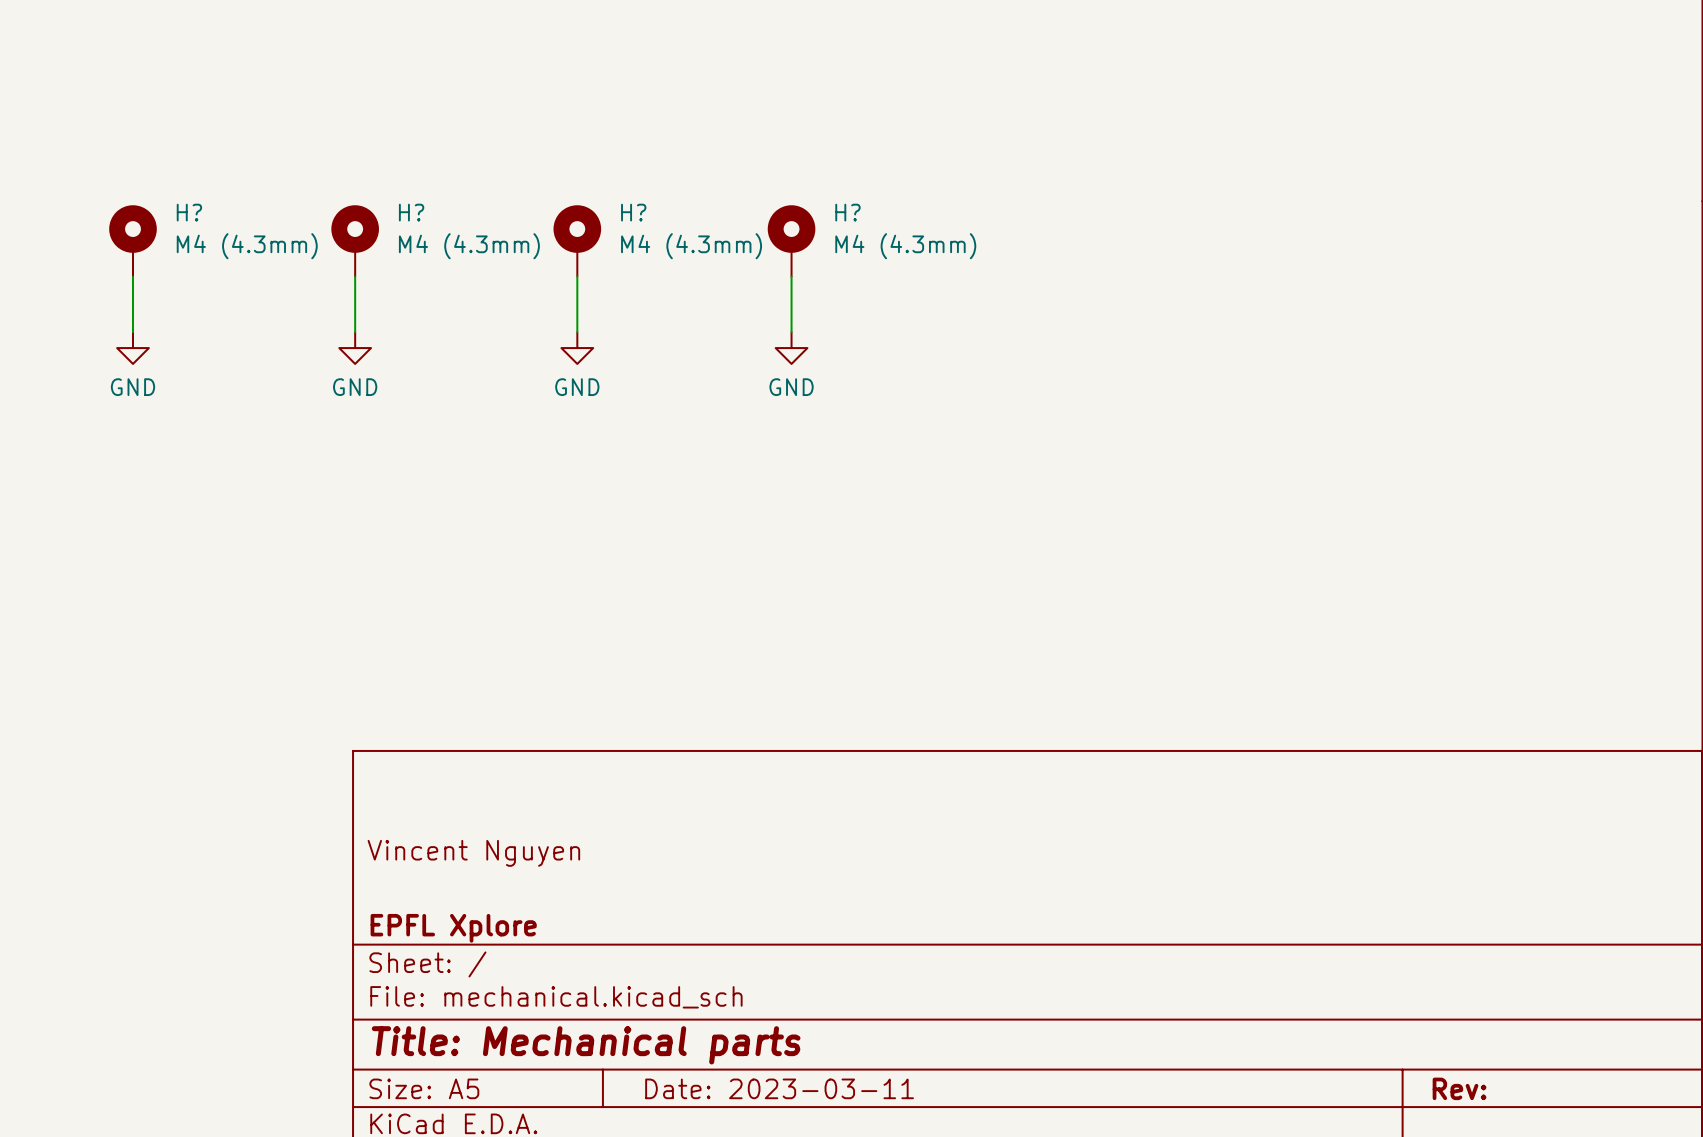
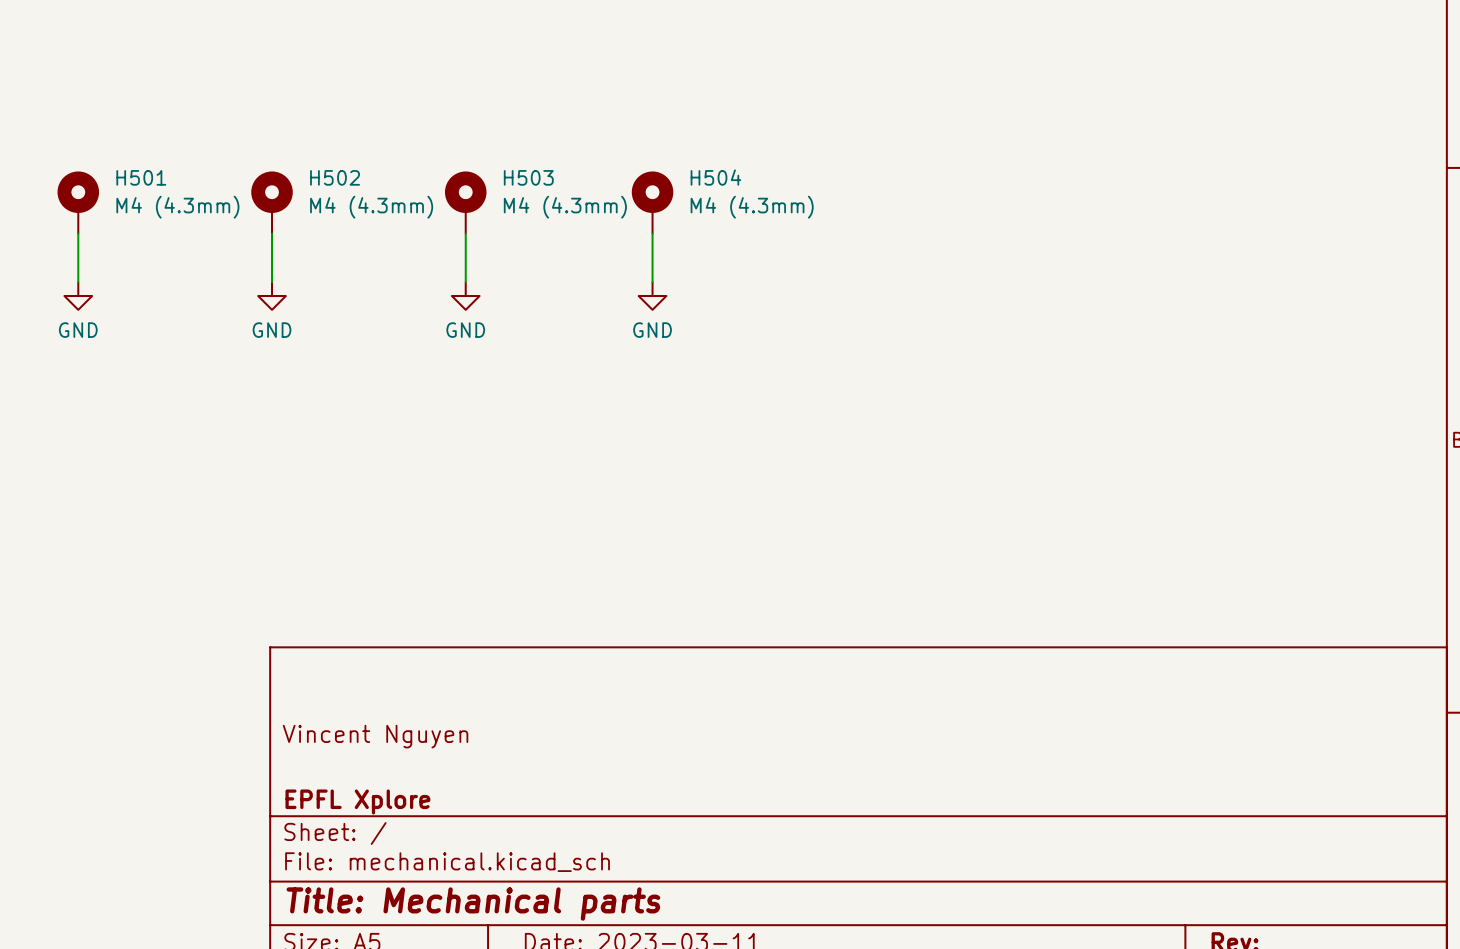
H? name: H? (189, 212) -> H501 (141, 177)
H? name: H? (411, 212) -> H502 (335, 177)
H? name: H? (633, 212) -> H503 (528, 177)
H? name: H? (847, 212) -> H504 (715, 177)

